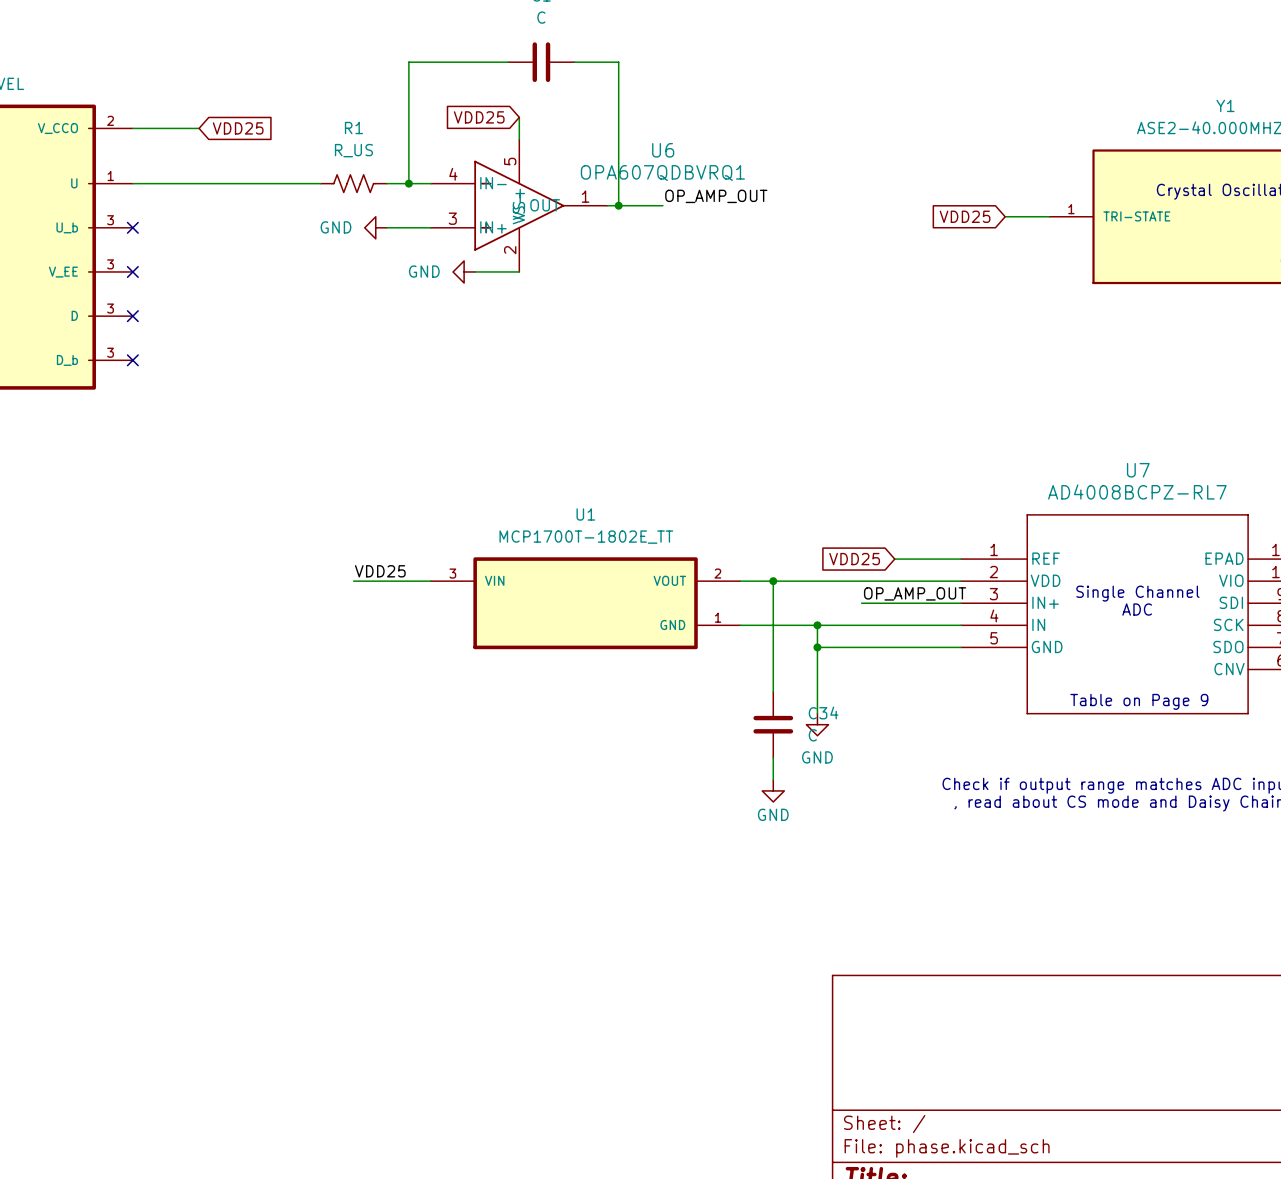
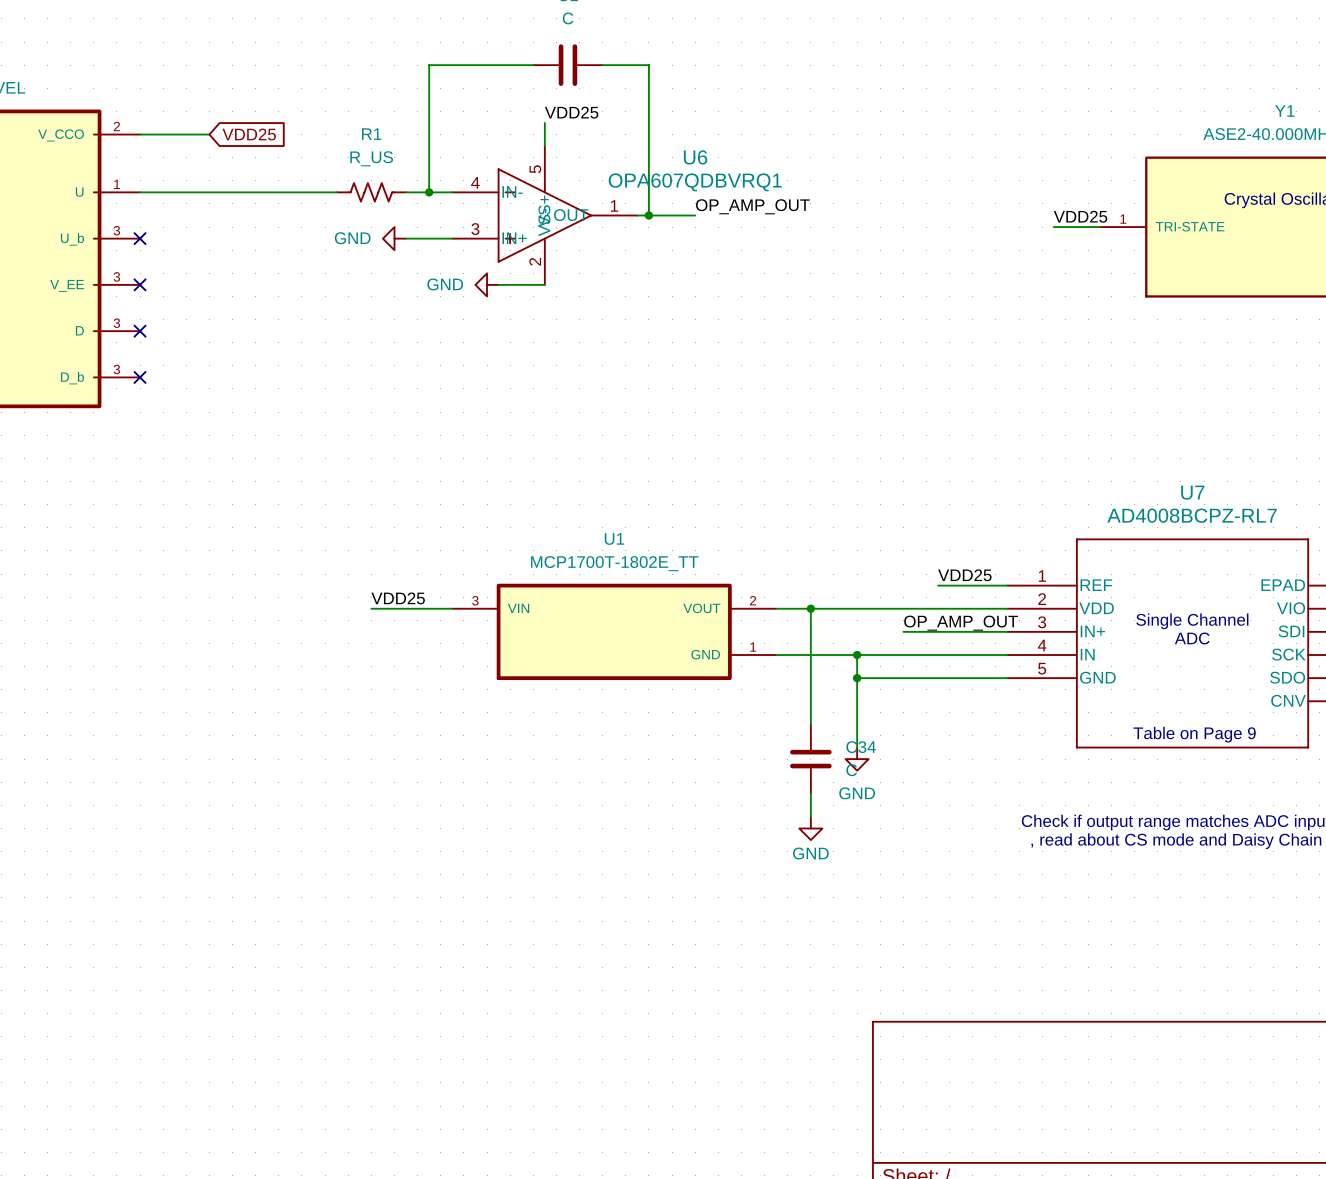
label: none -> VDD25 (571, 112)
global label: VDD25 (479, 117) -> none
label: none -> VDD25 (1080, 216)
global label: VDD25 (965, 216) -> none
label: none -> VDD25 (964, 575)
global label: VDD25 (854, 559) -> none

